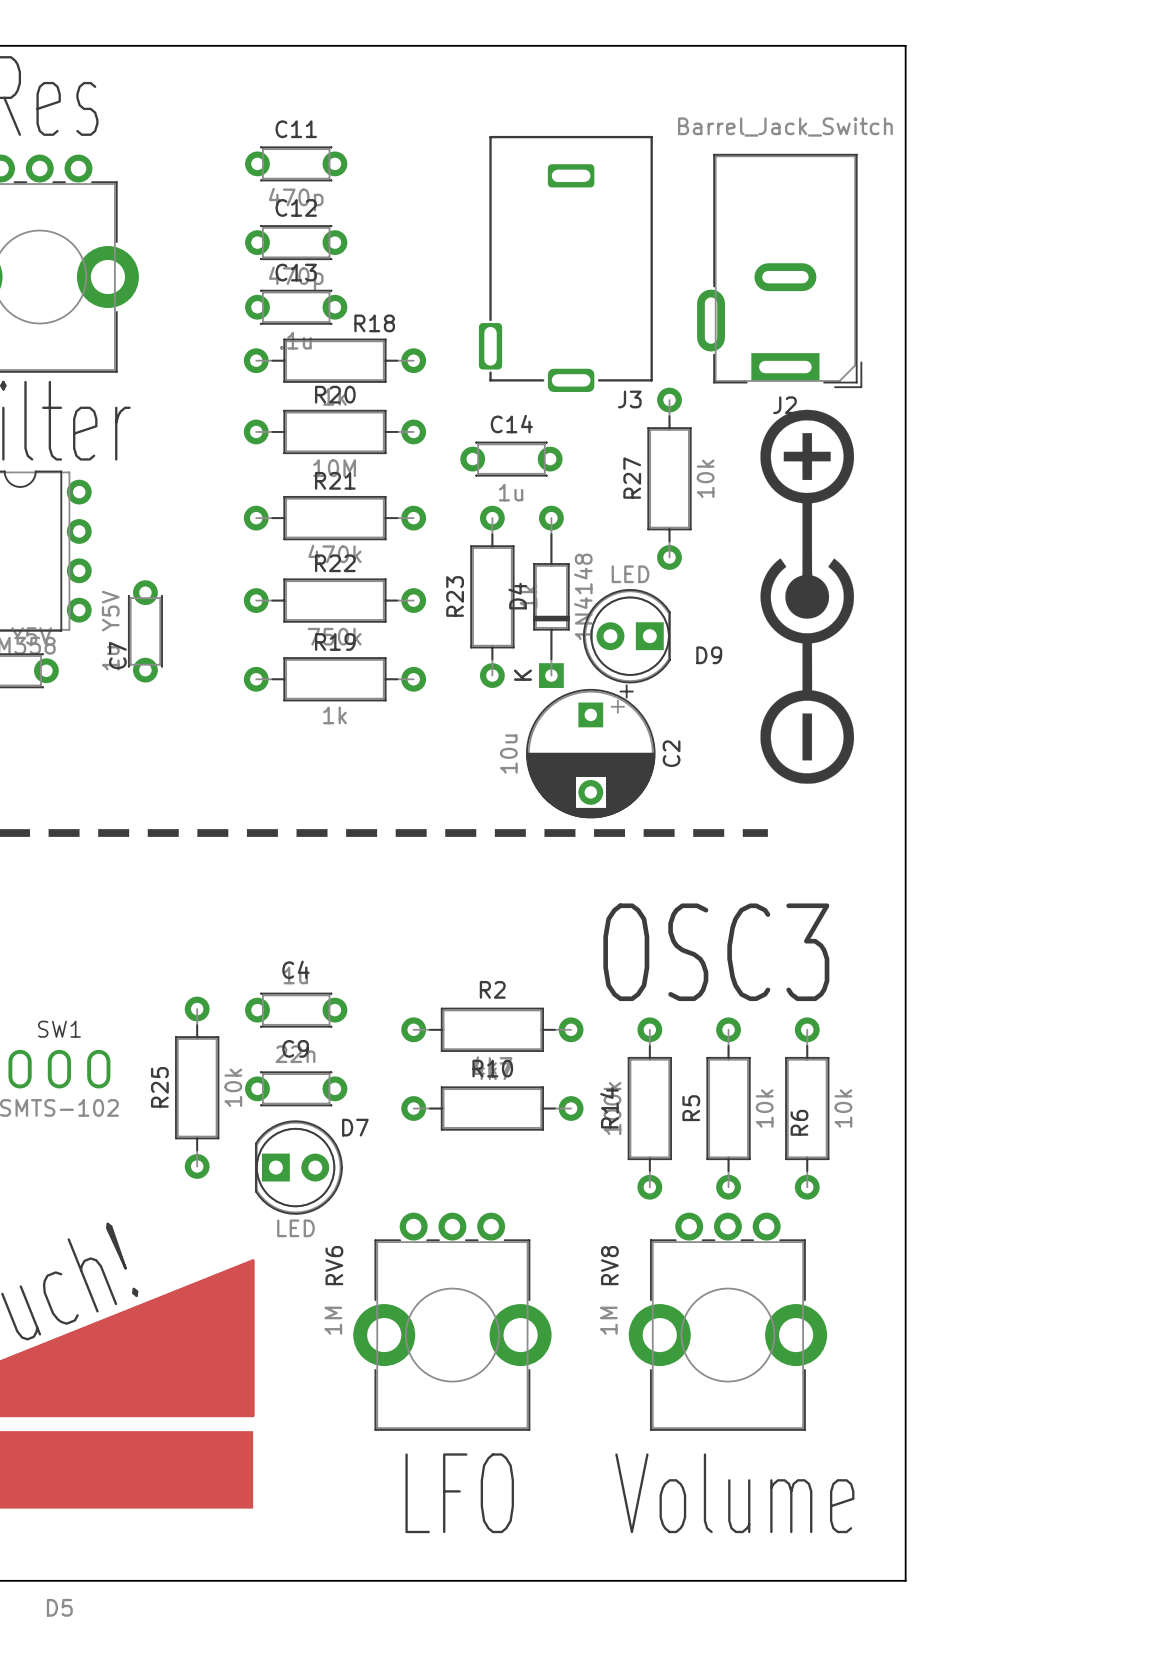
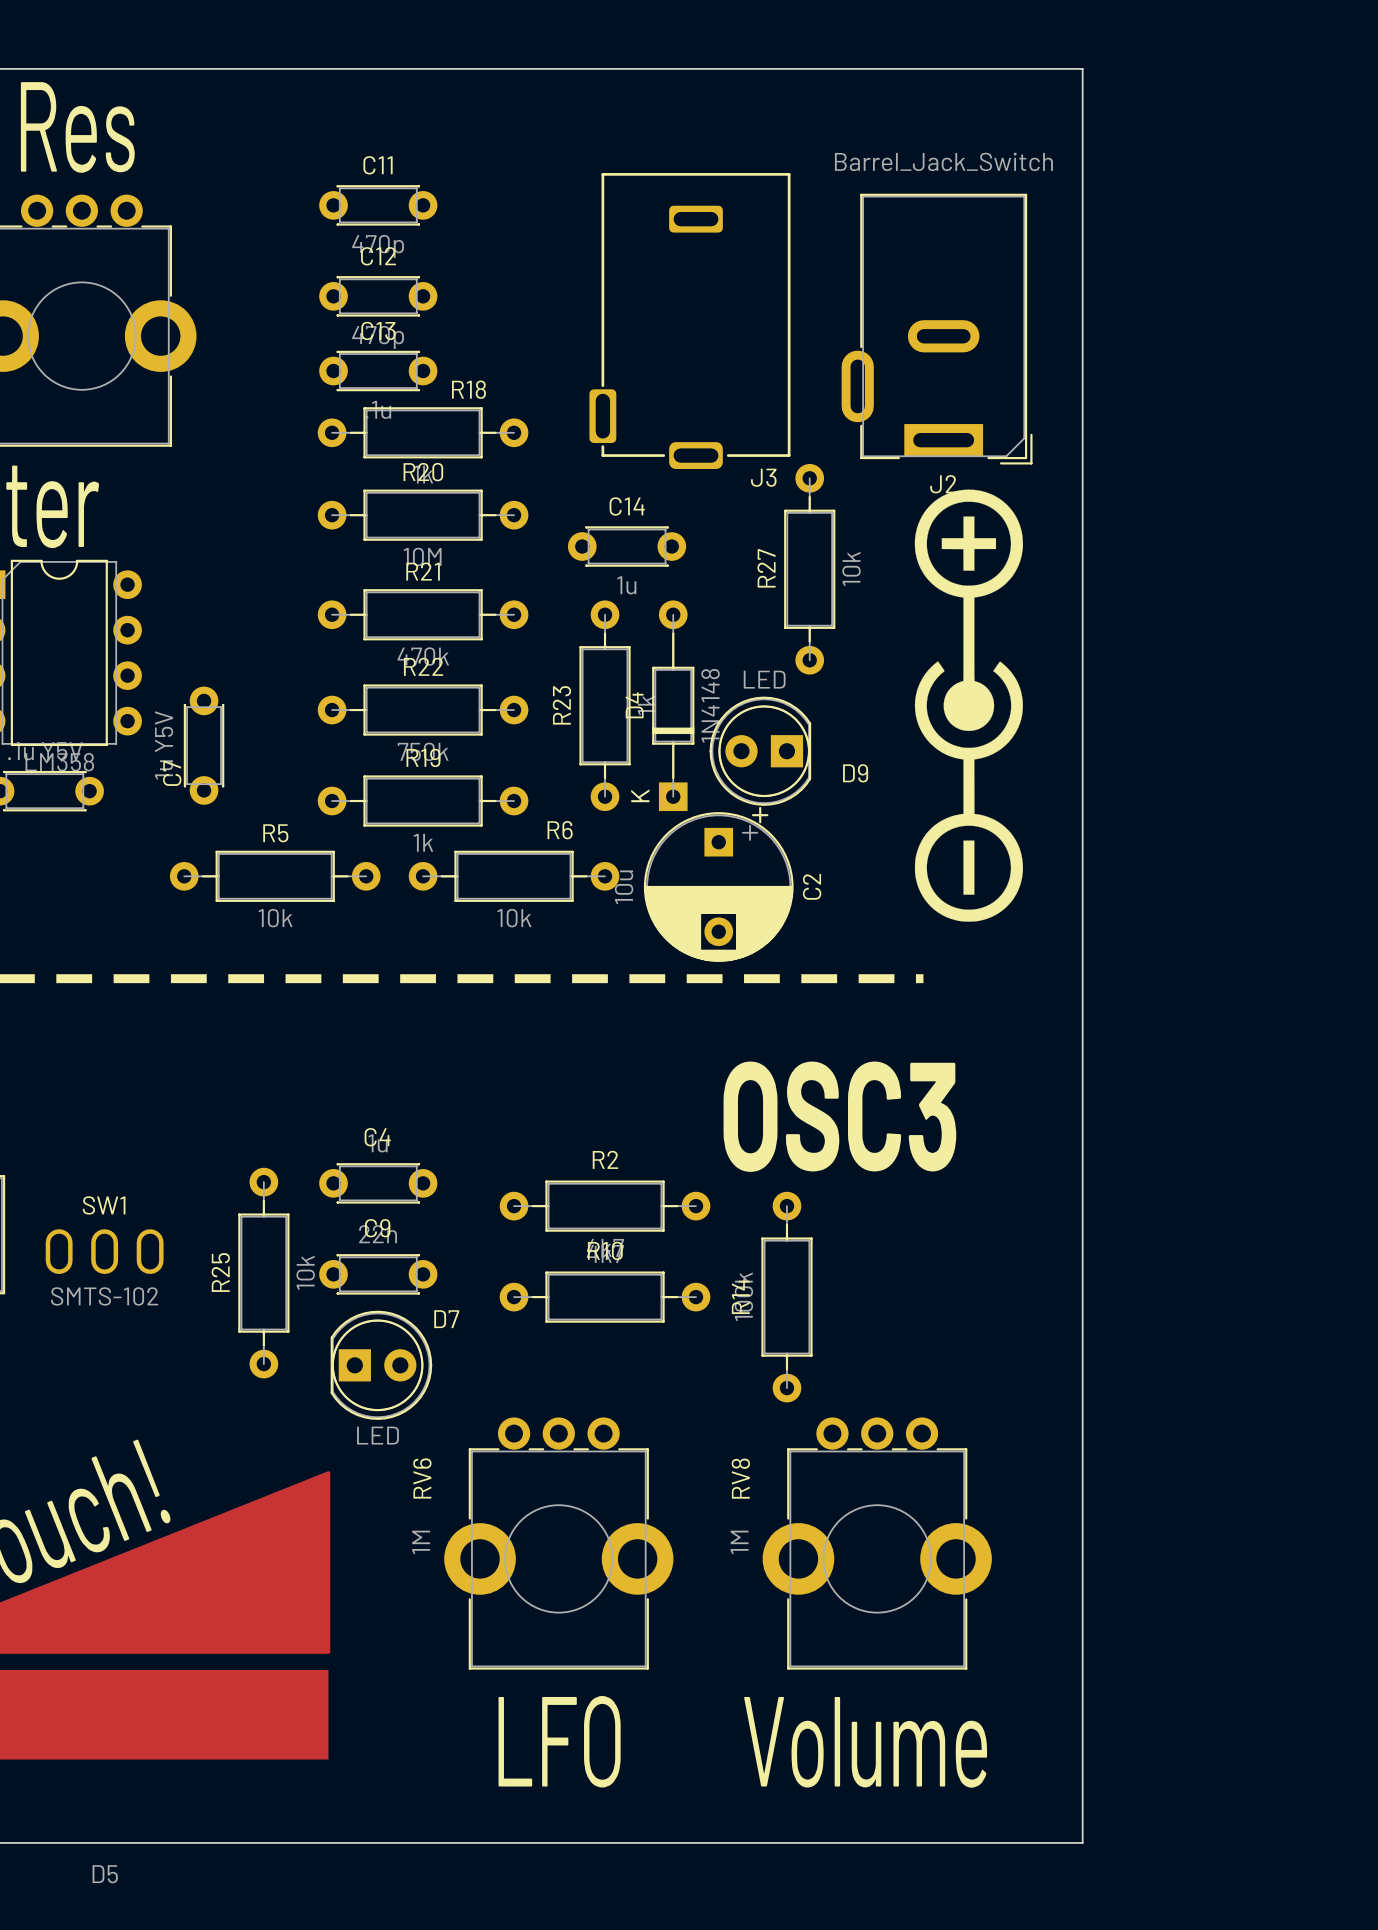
R5 rotation: 0° (728, 1108) -> 90° clockwise (275, 876)
R5 position: (728, 1108) -> (275, 876)
R6 rotation: 0° (807, 1108) -> 90° clockwise (514, 876)
R6 position: (807, 1108) -> (514, 876)
R6 name position: R6 (799, 1122) -> R6 (560, 830)

